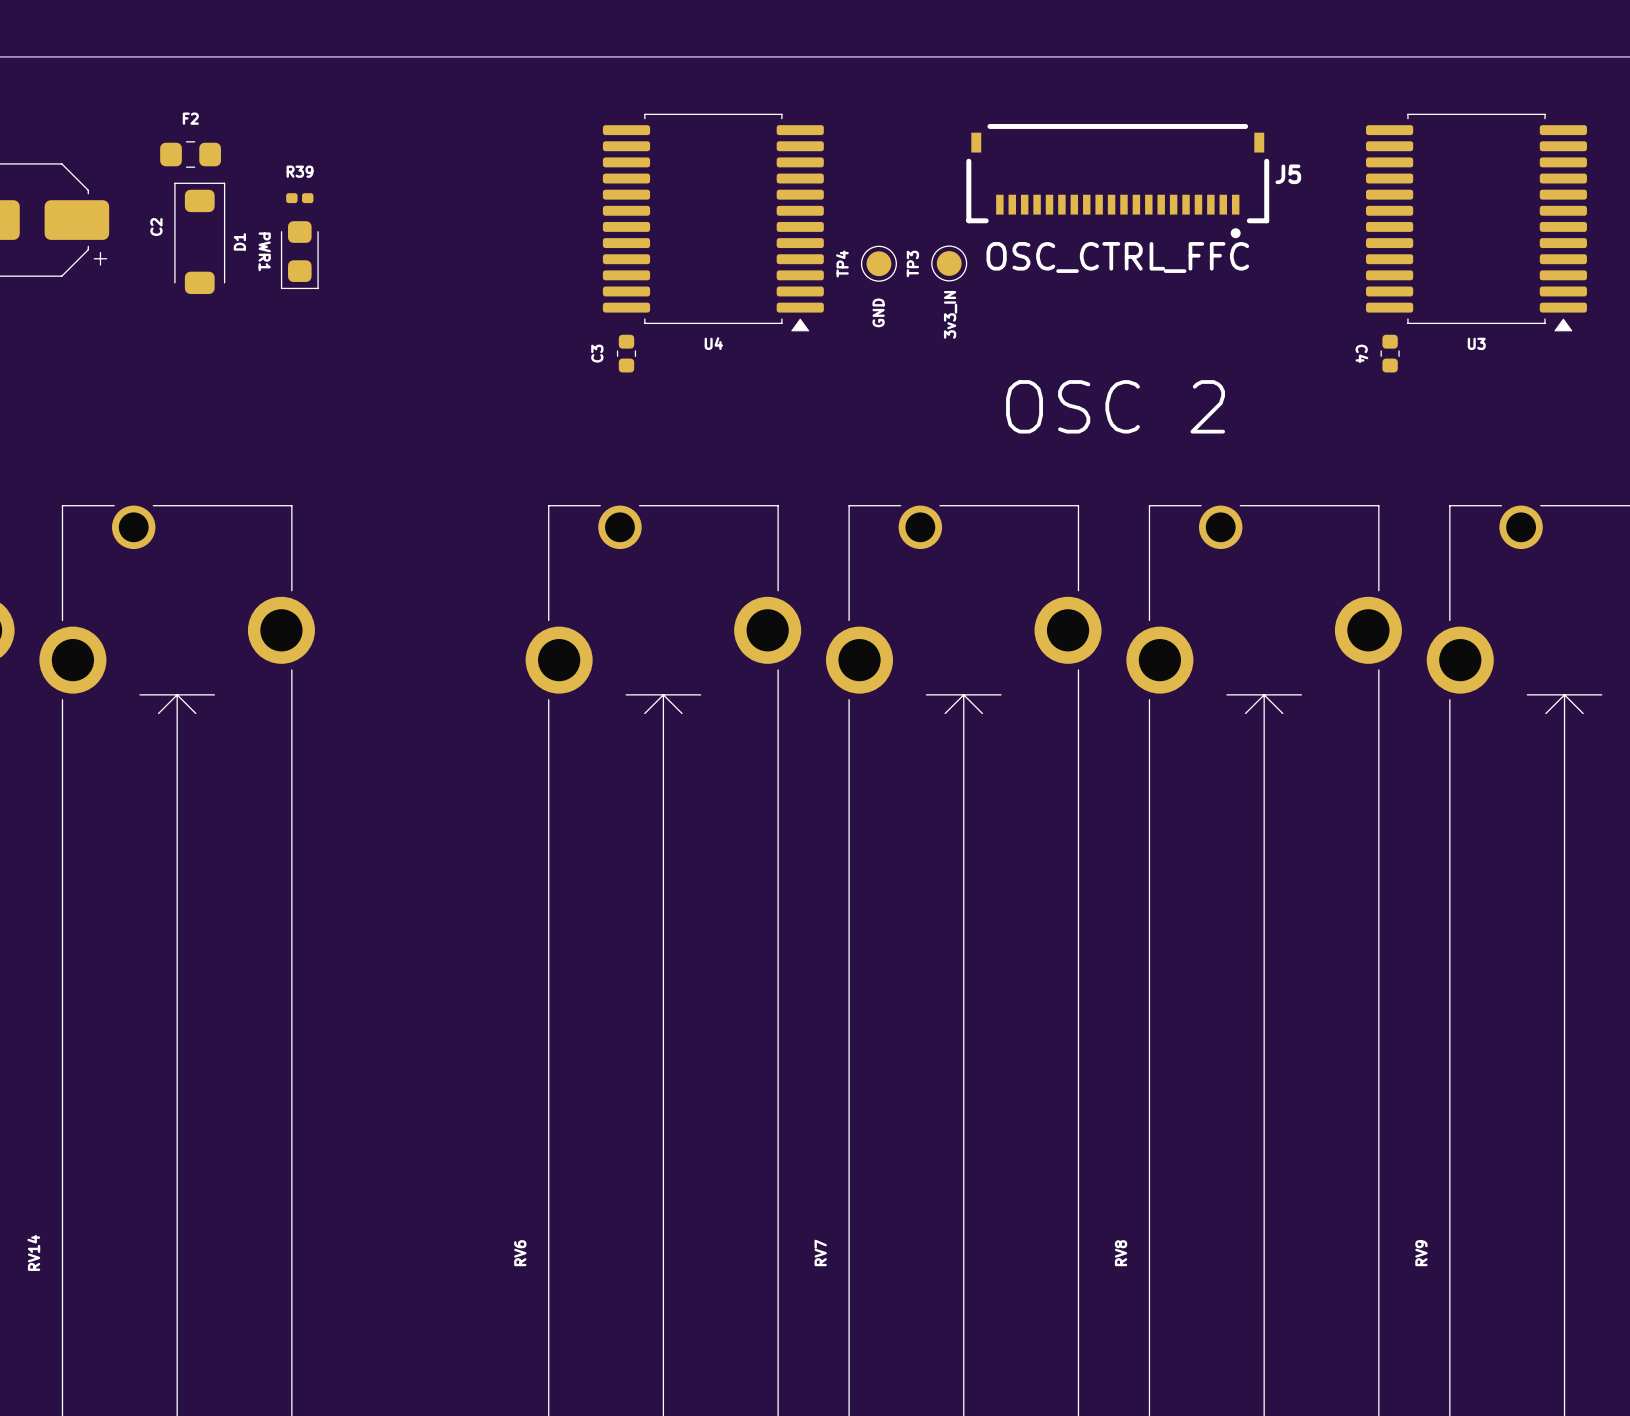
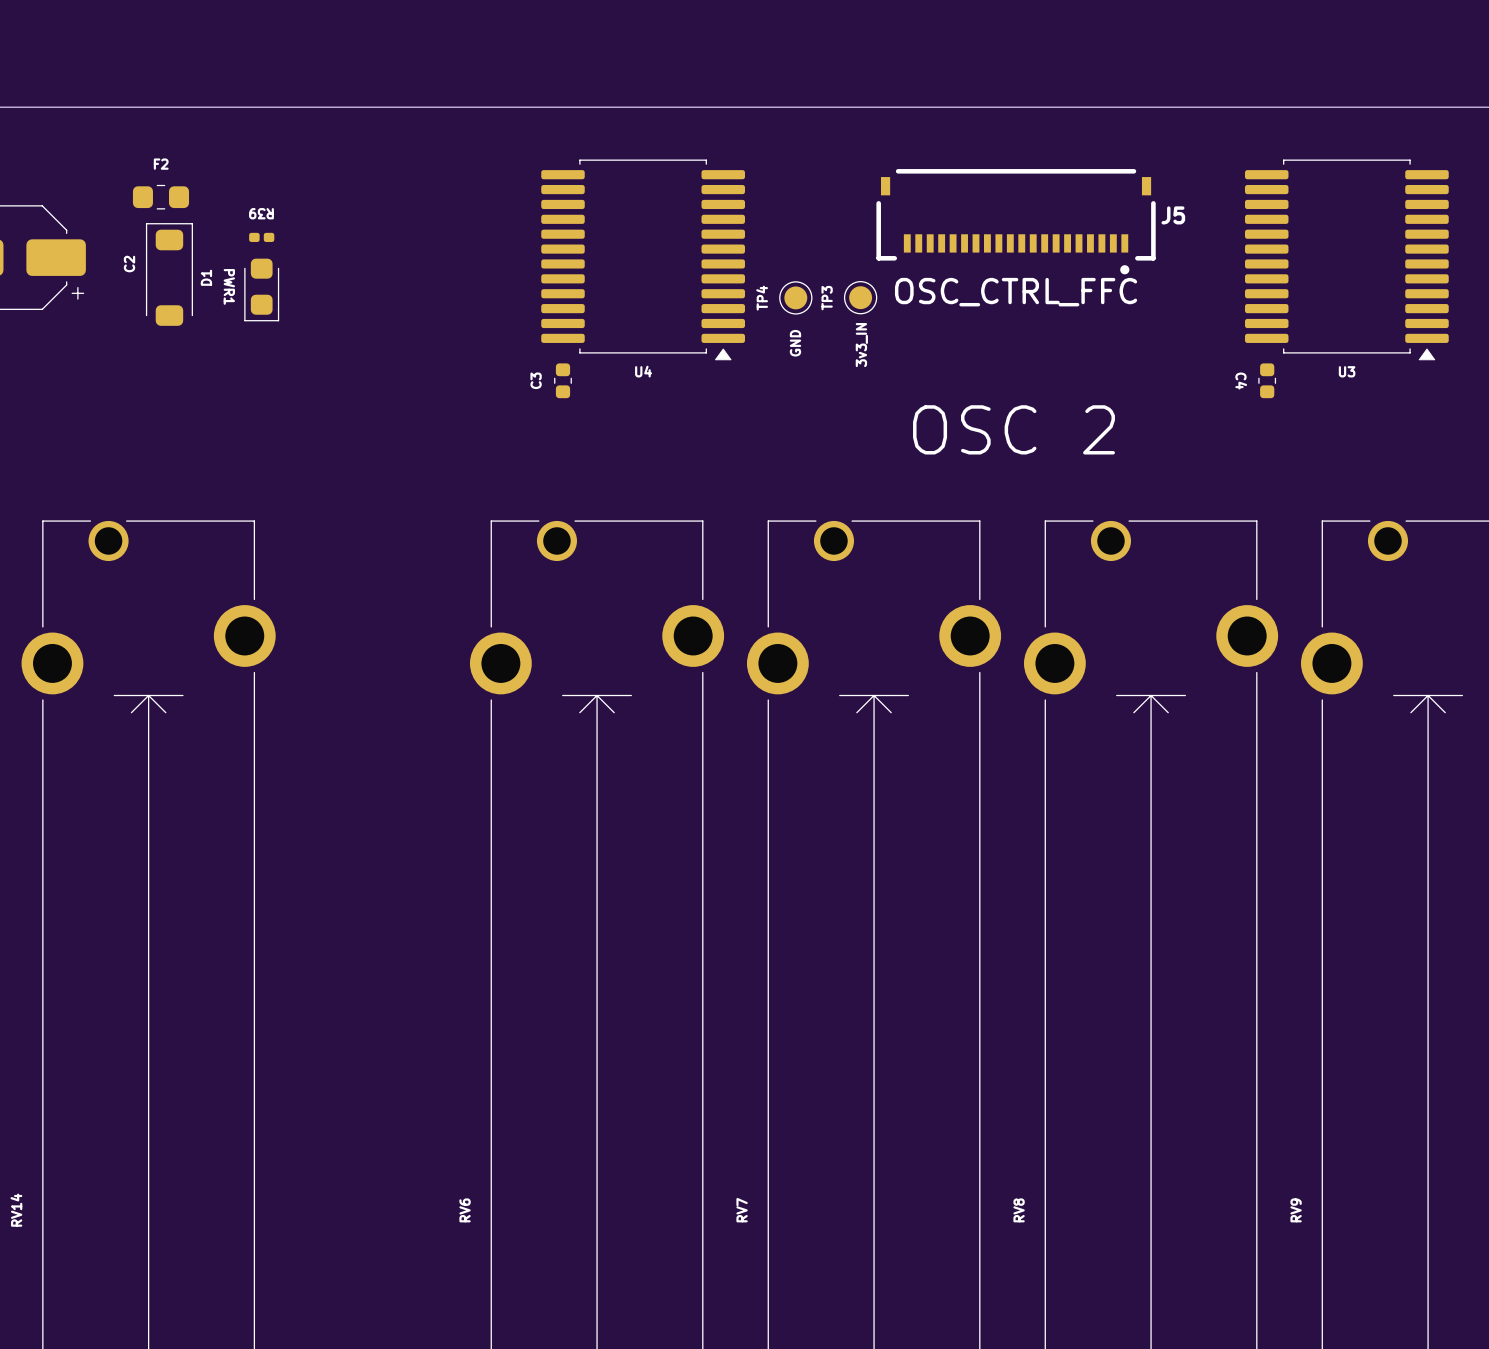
R39 name rotation: 0° (300, 171) -> 180° (261, 213)

